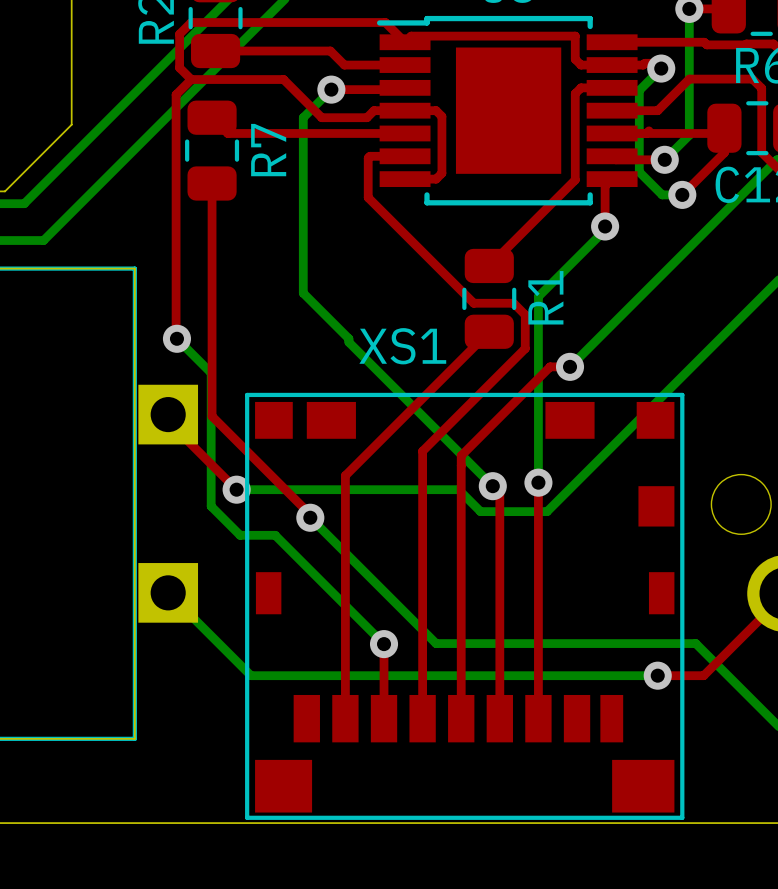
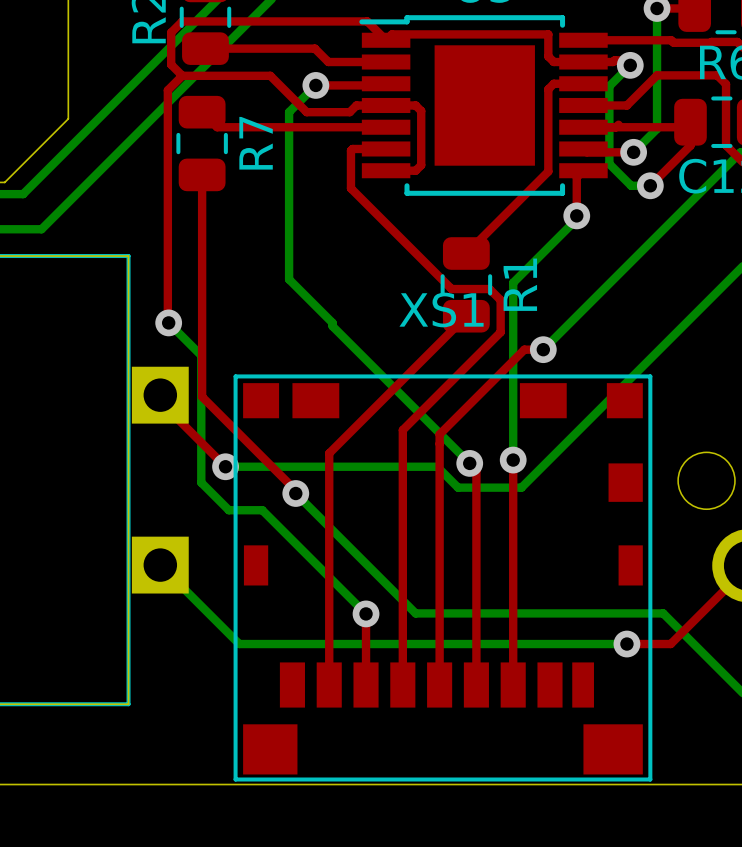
XS1 name position: XS1 (402, 346) -> XS1 (441, 309)

